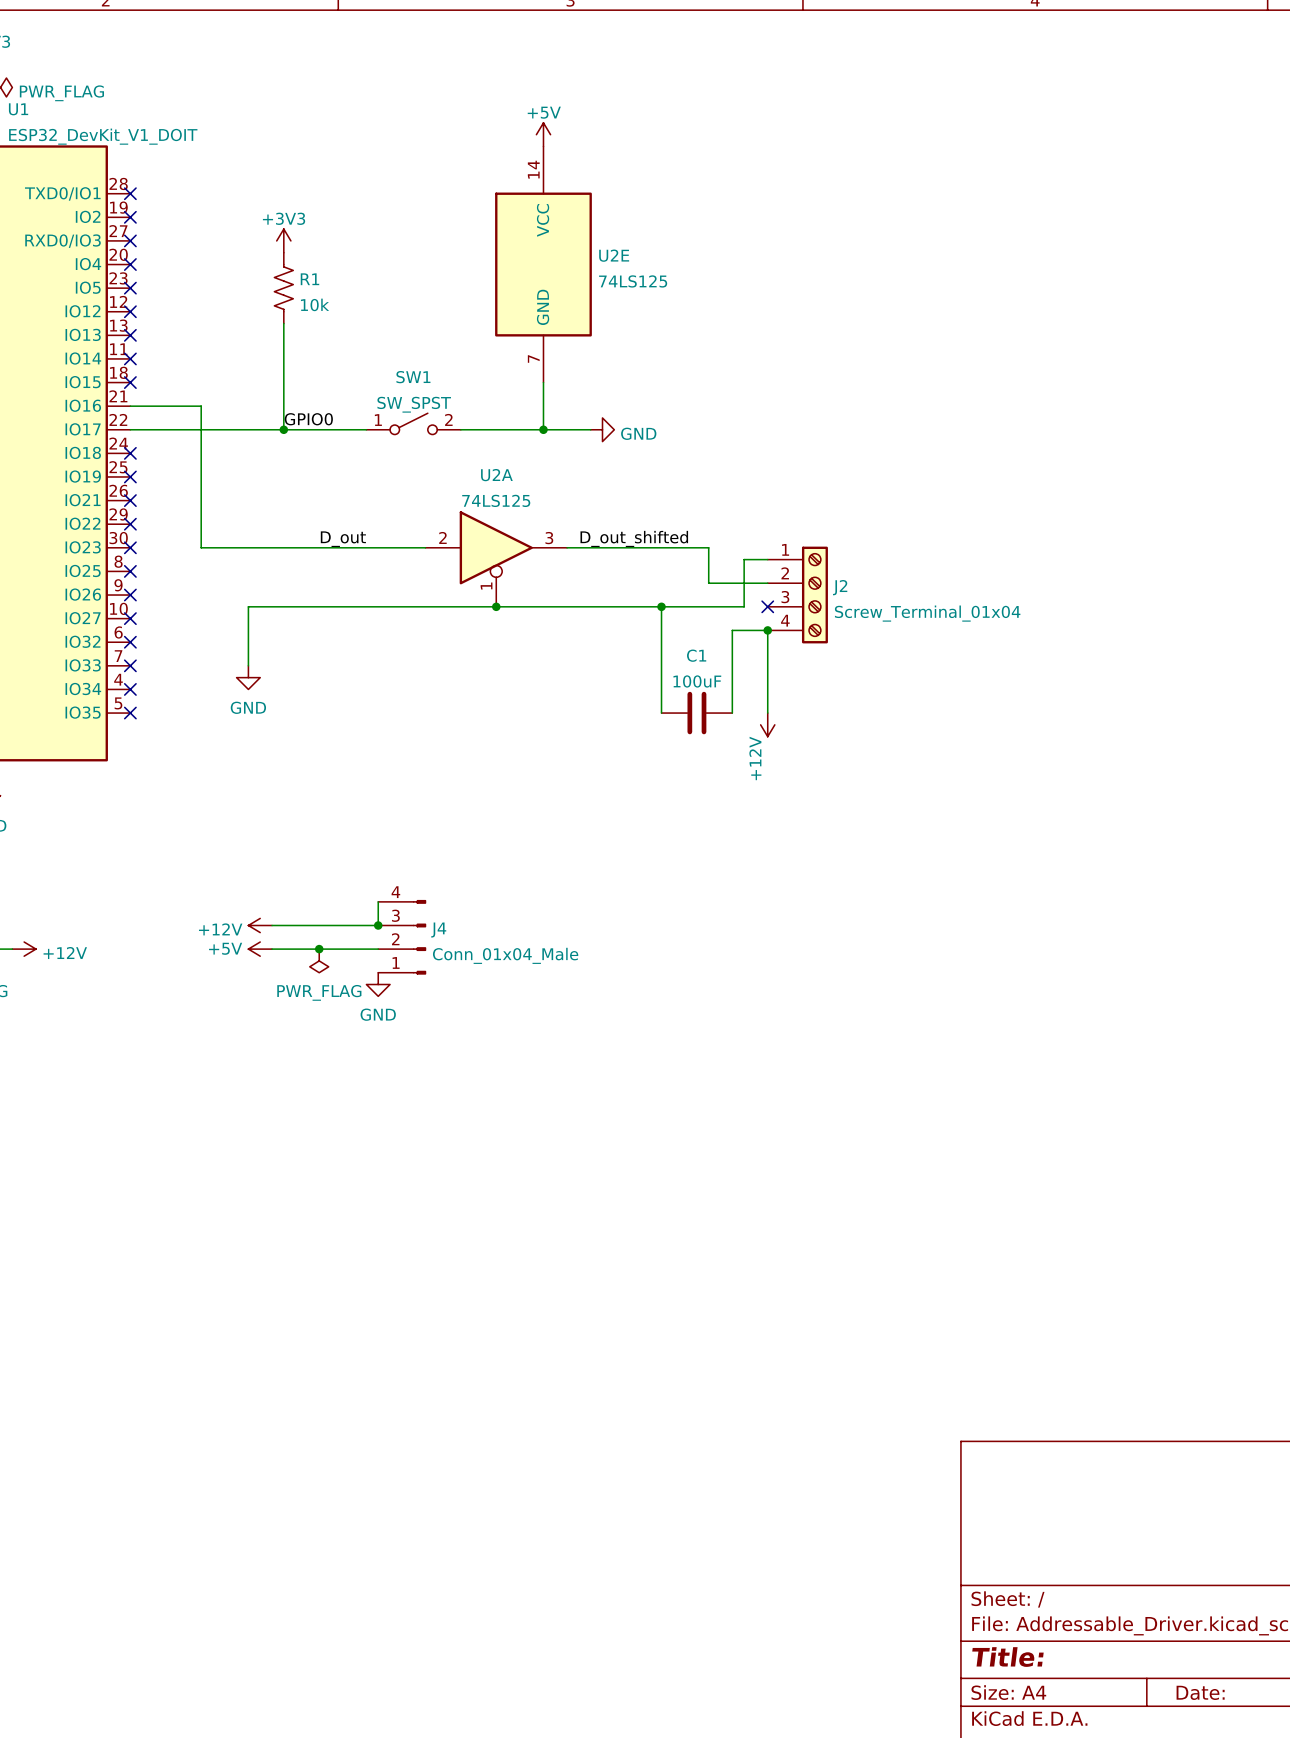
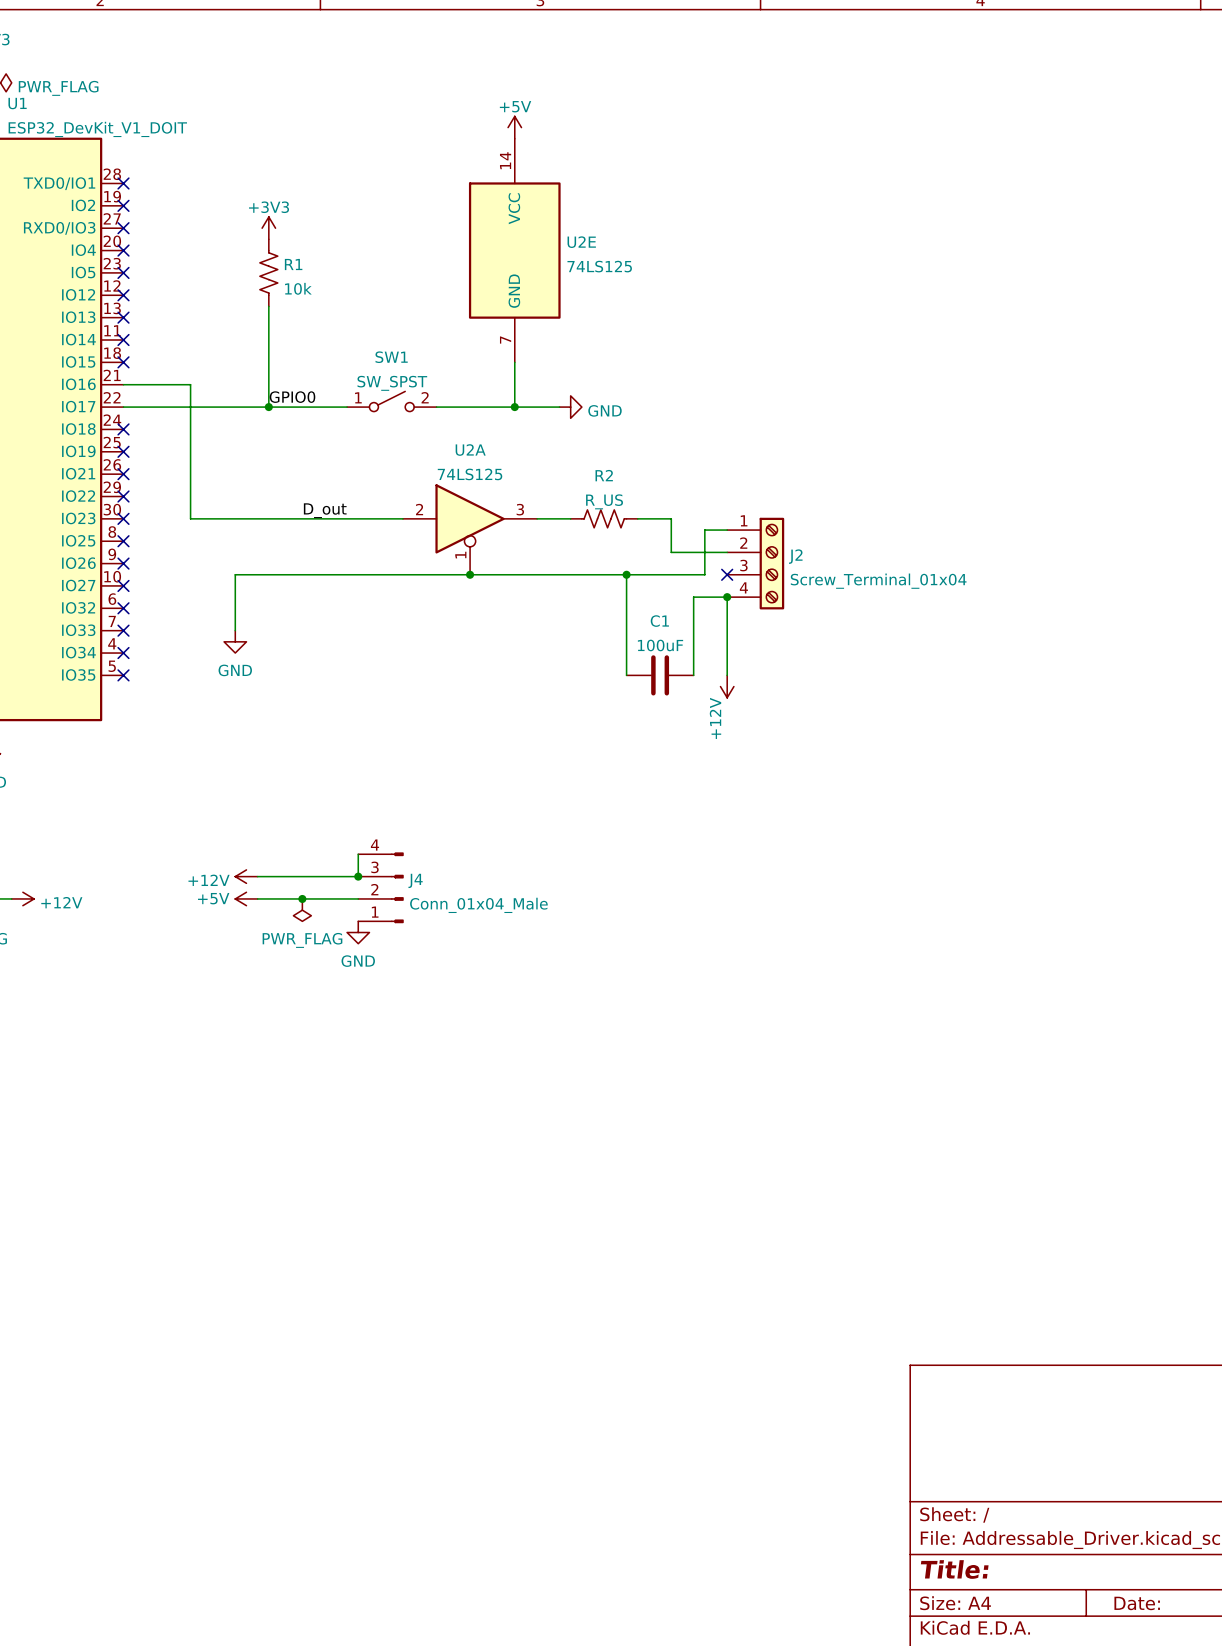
label: D_out_shifted (634, 538) -> none
R2: none -> R_US (604, 518)

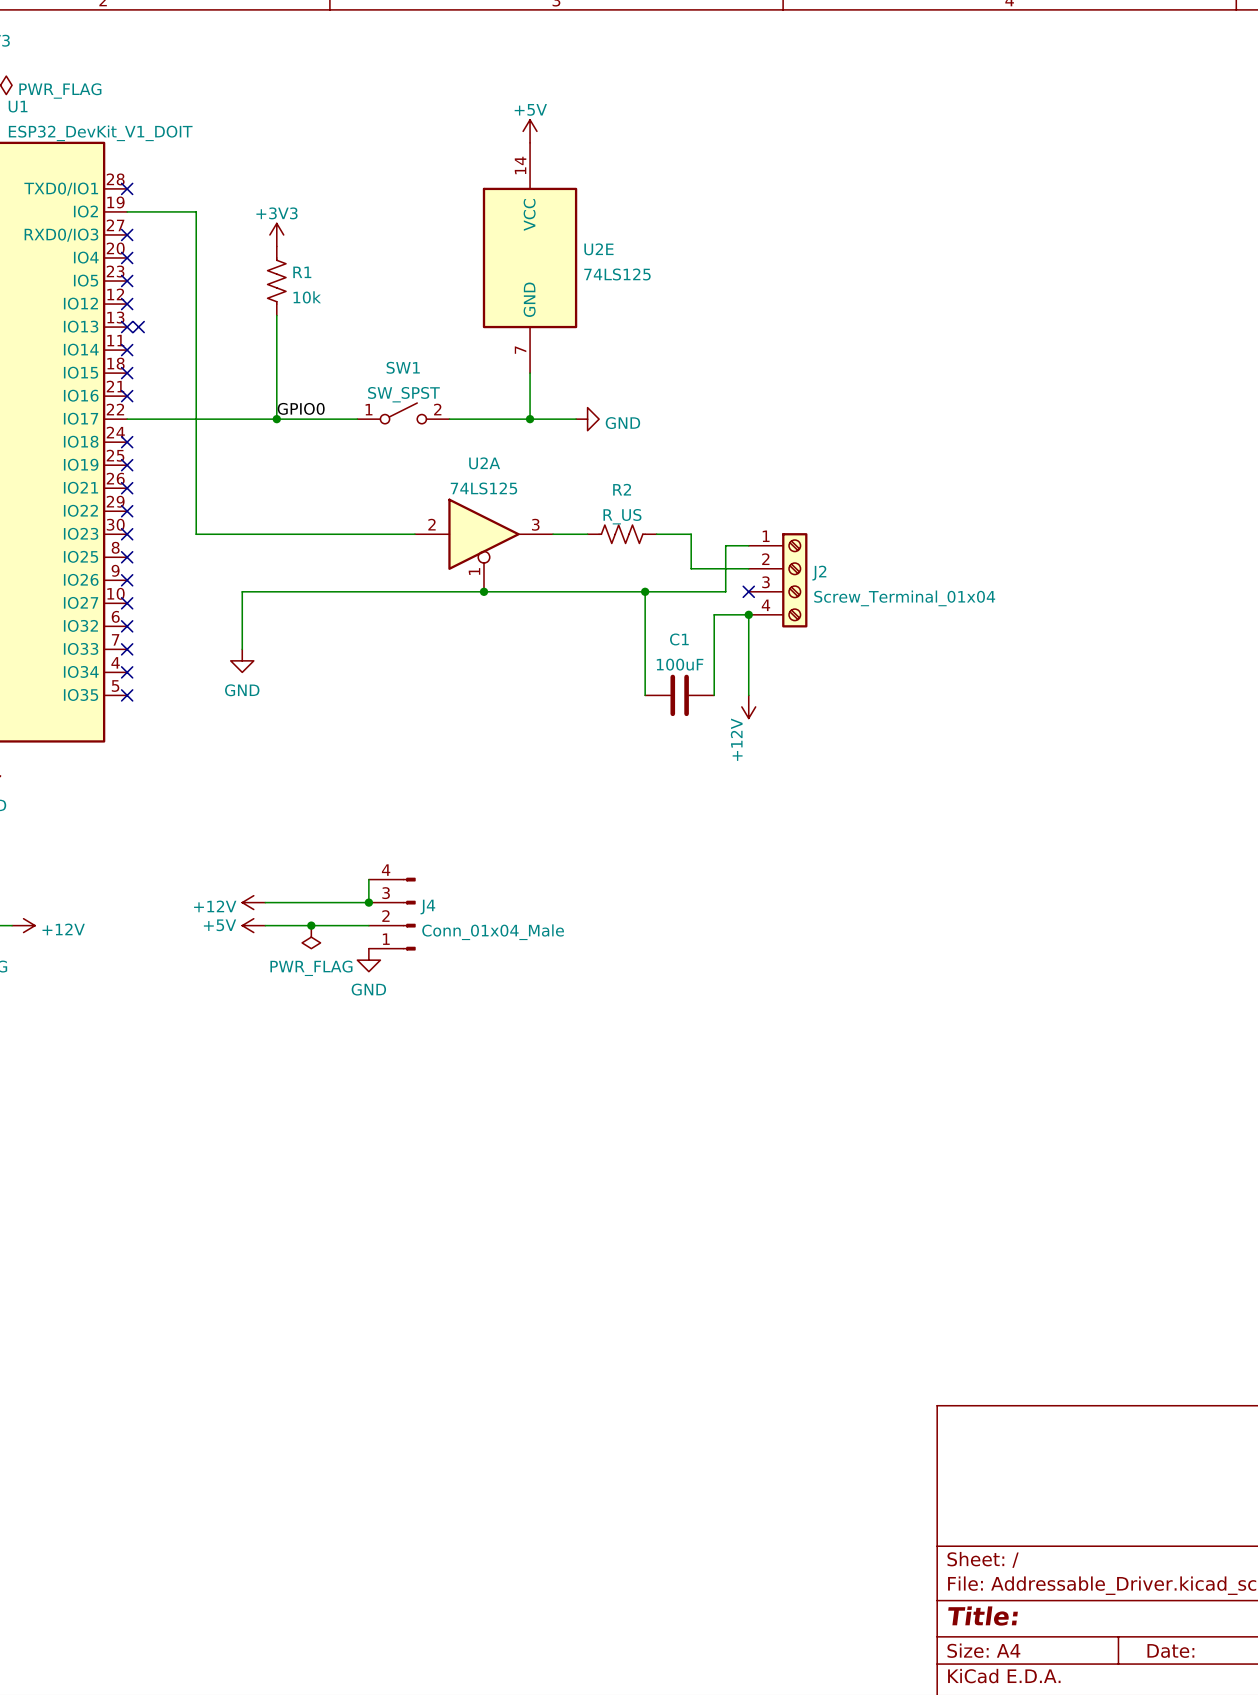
no-connect mark: (123, 205) -> none
no-connect mark: none -> (138, 327)
wire: (123, 384) (190, 384) -> (127, 211) (196, 211) (196, 396)
no-connect mark: none -> (127, 396)
label: D_out (325, 510) -> none

